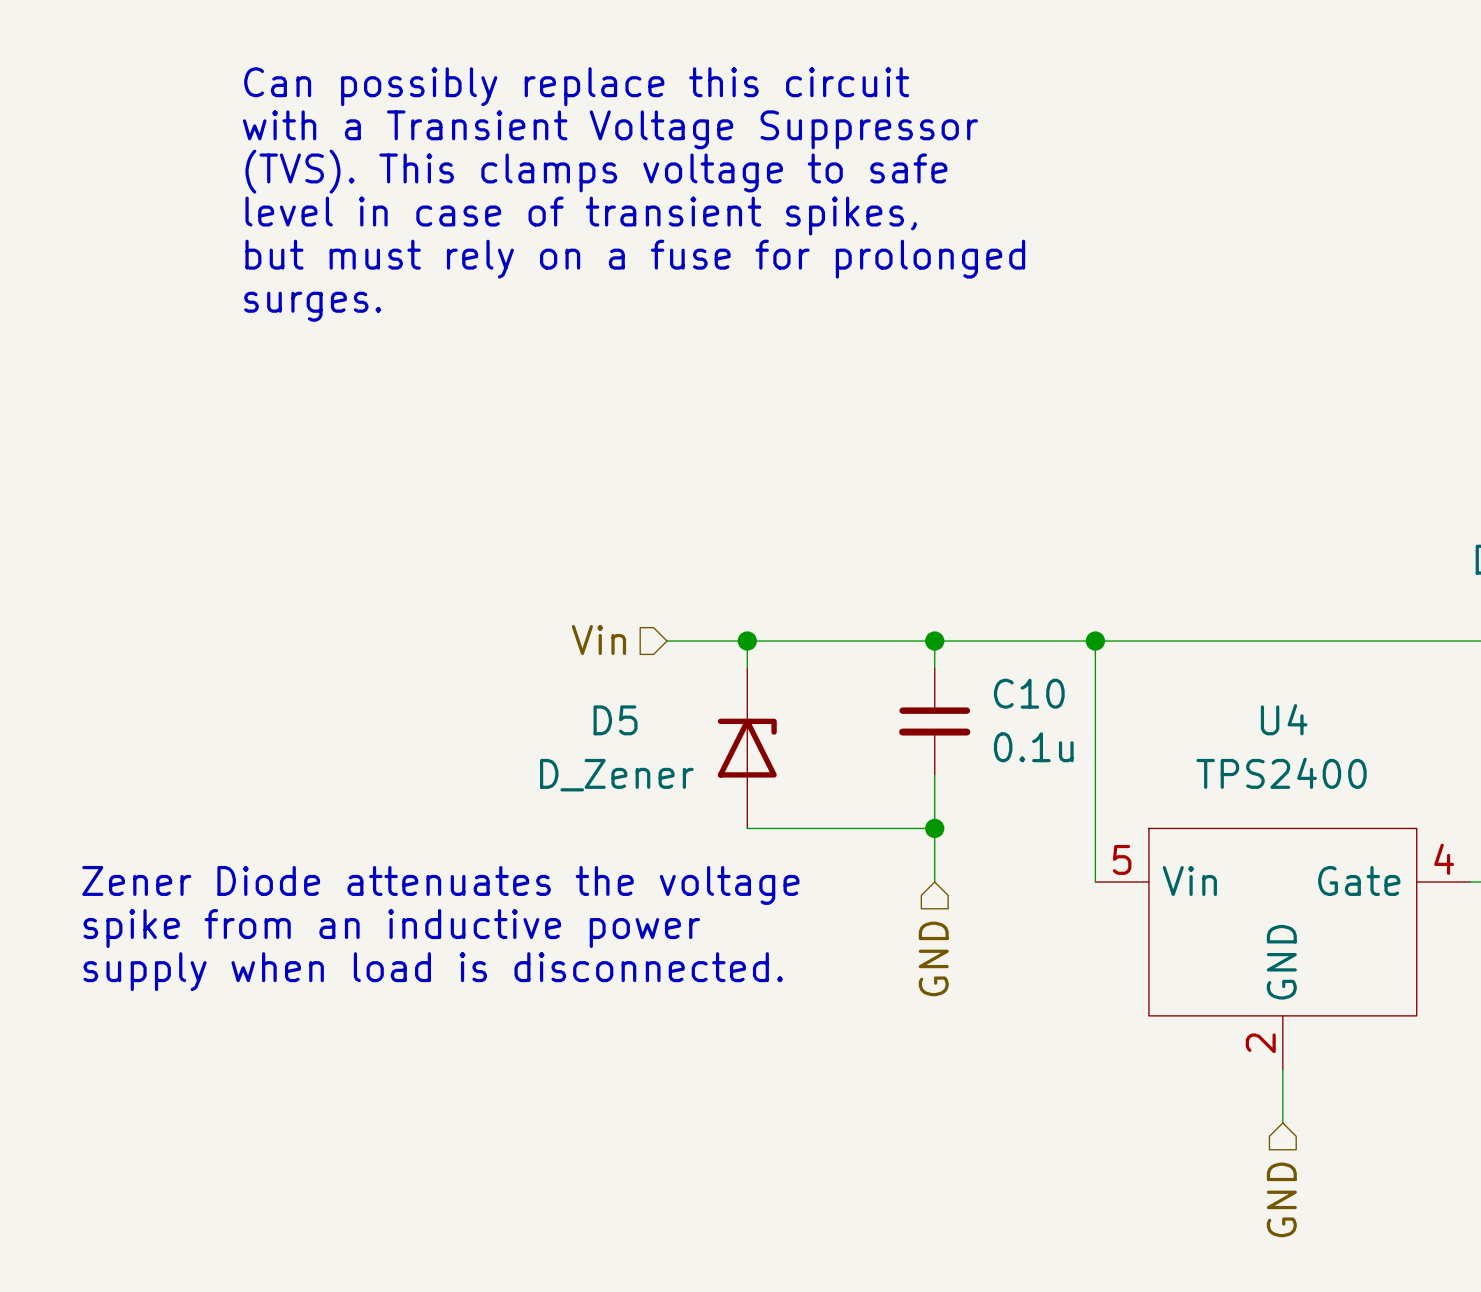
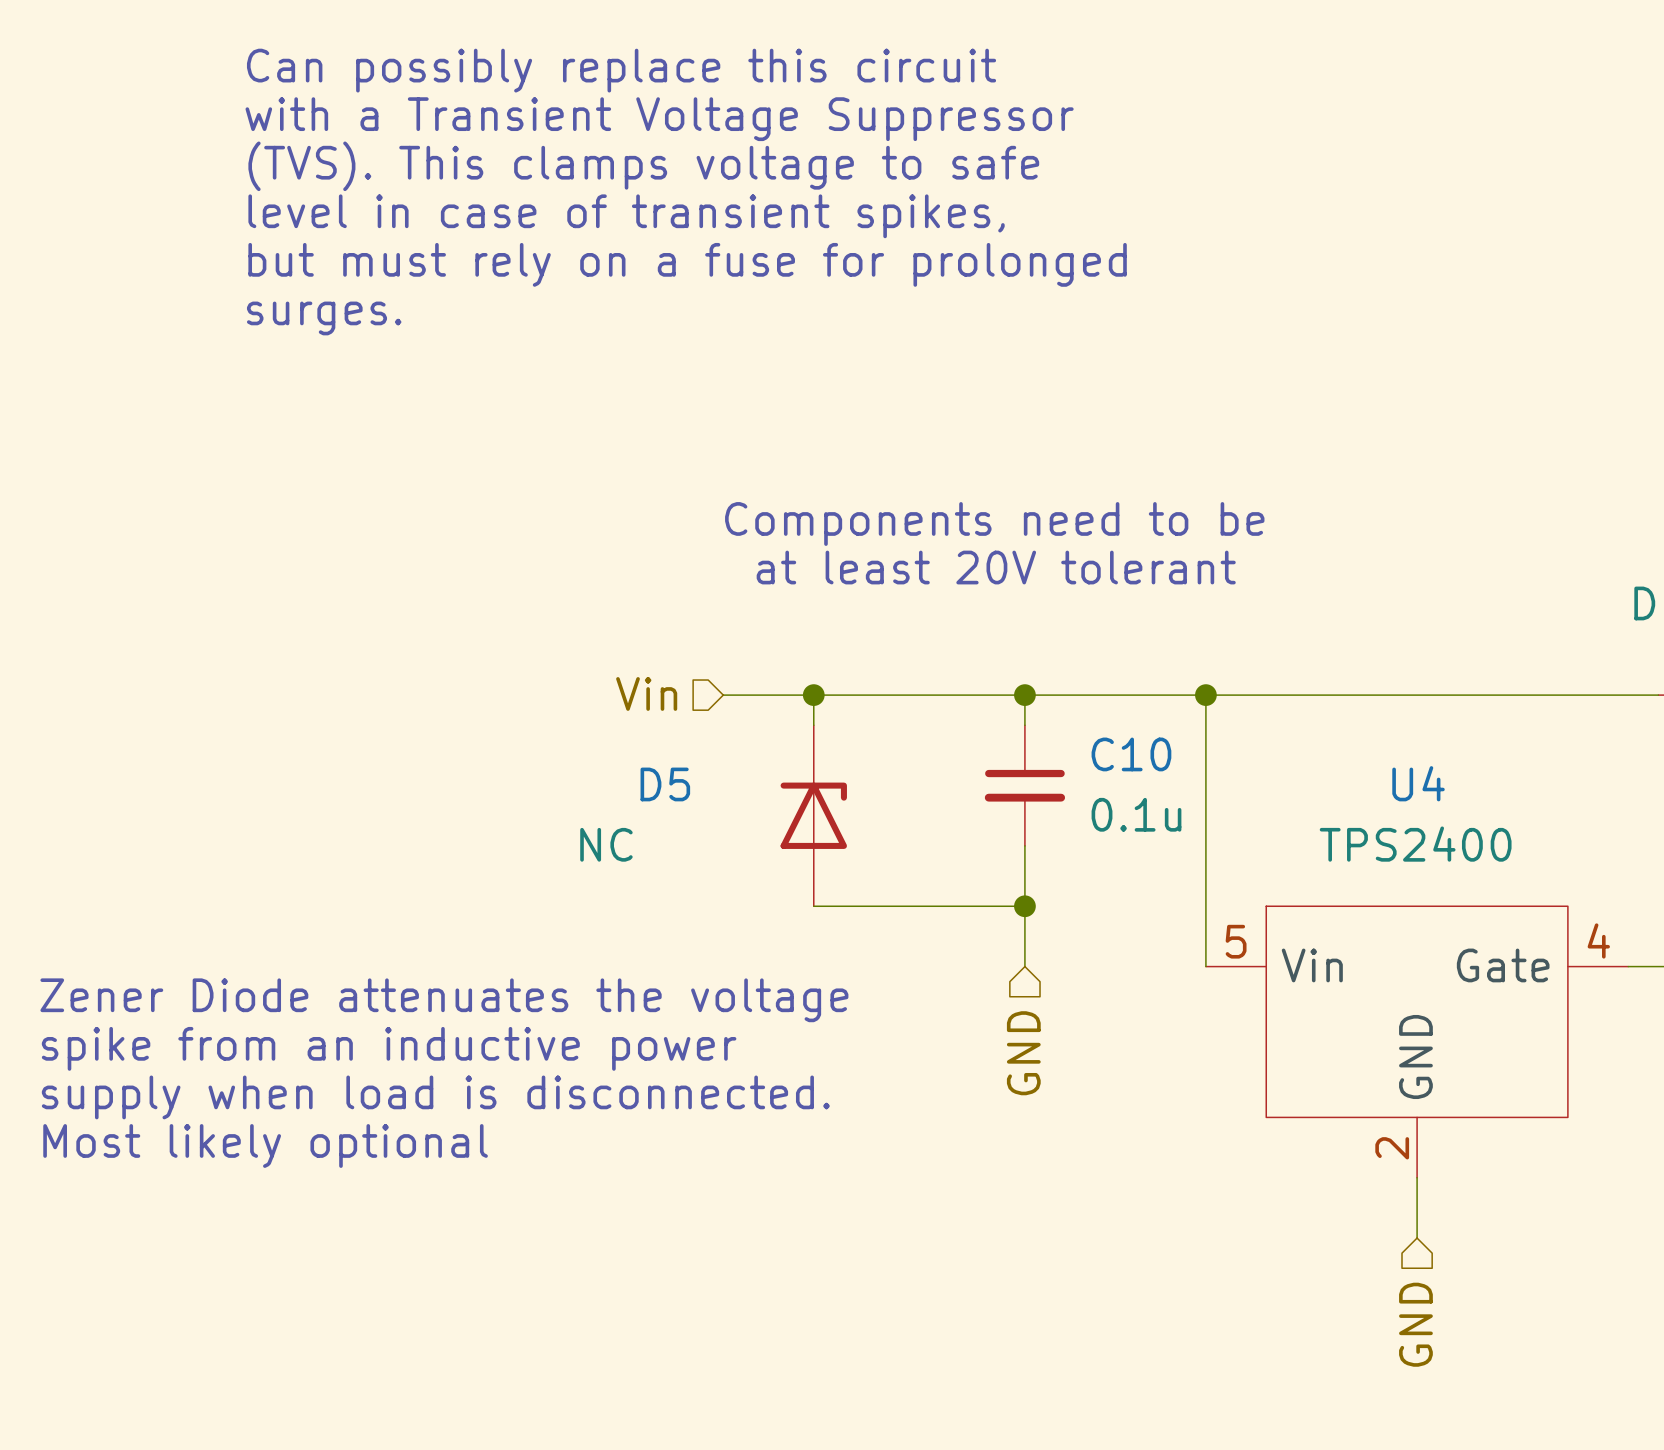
text: none -> Components need to be (994, 523)
text: none -> at least 20V tolerant (996, 567)
D5 value: D_Zener (616, 775) -> NC (606, 844)
text position: Zener Diode attenuates the voltage (440, 885) -> Zener Diode attenuates the voltage (444, 1000)
text position: spike from an inductive power (391, 928) -> spike from an inductive power (389, 1048)
text position: supply when load is disconnected. (433, 971) -> supply when load is disconnected. (435, 1097)
text: none -> Most likely optional (265, 1145)

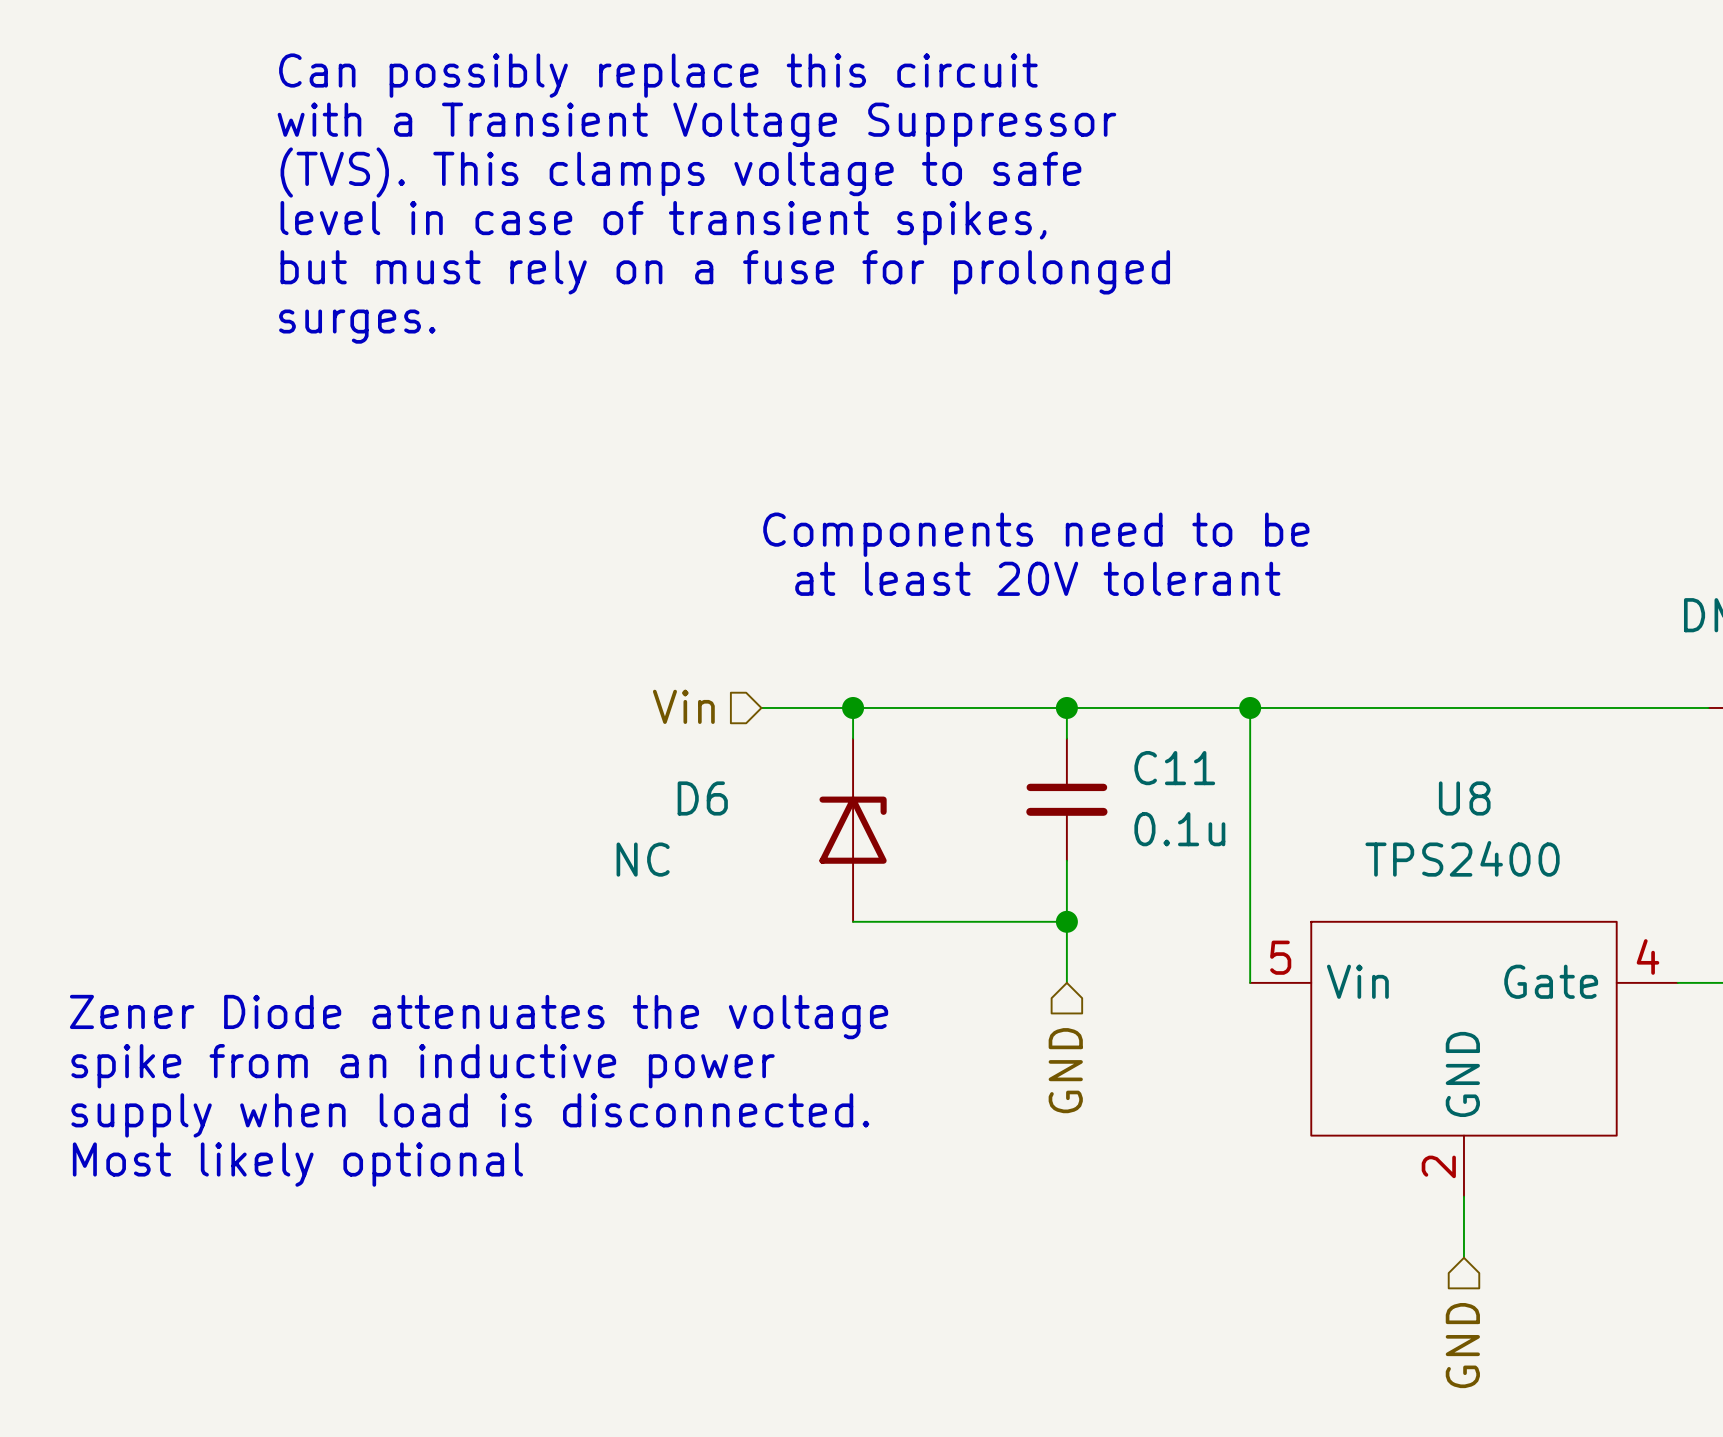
C10 name: C10 (1131, 754) -> C11 (1174, 768)
U4 name: U4 (1418, 783) -> U8 (1464, 798)
D5 name: D5 (665, 784) -> D6 (702, 798)

